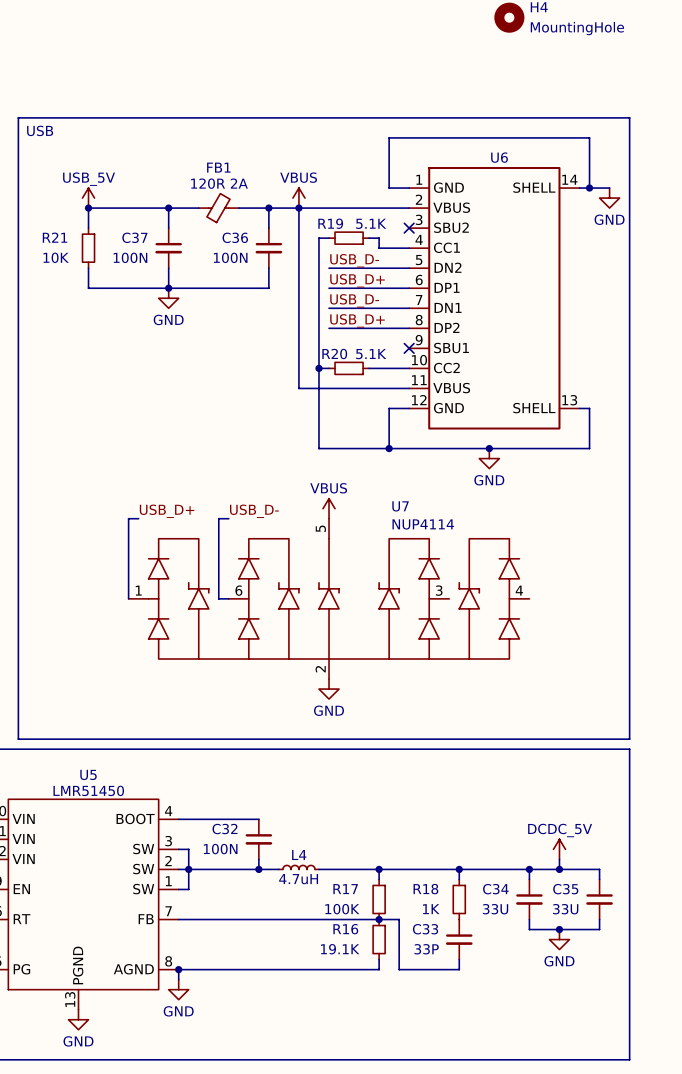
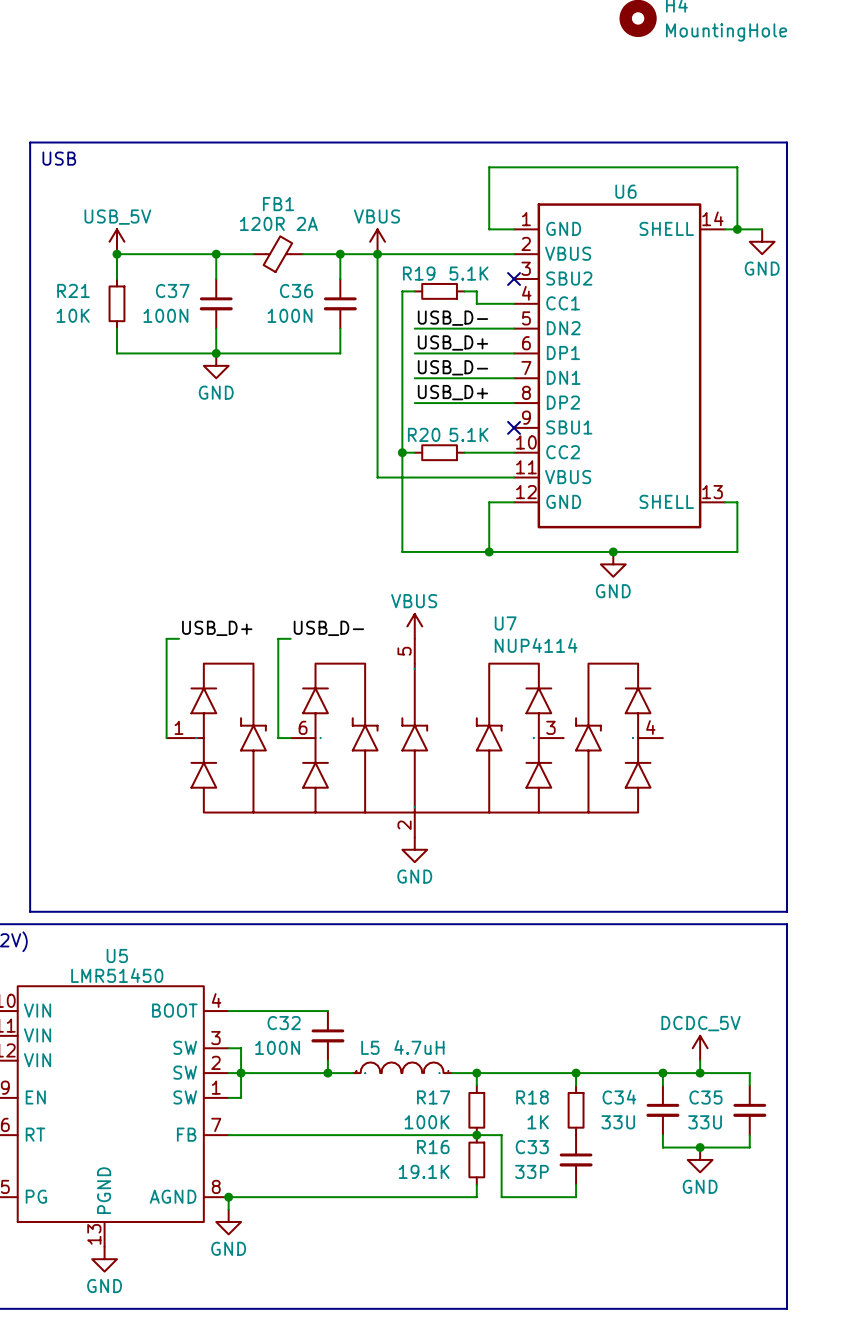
L5: none -> 4.7uH (402, 1067)
L4: 4.7uH (298, 867) -> none
wire: (318, 869) (359, 869) -> none

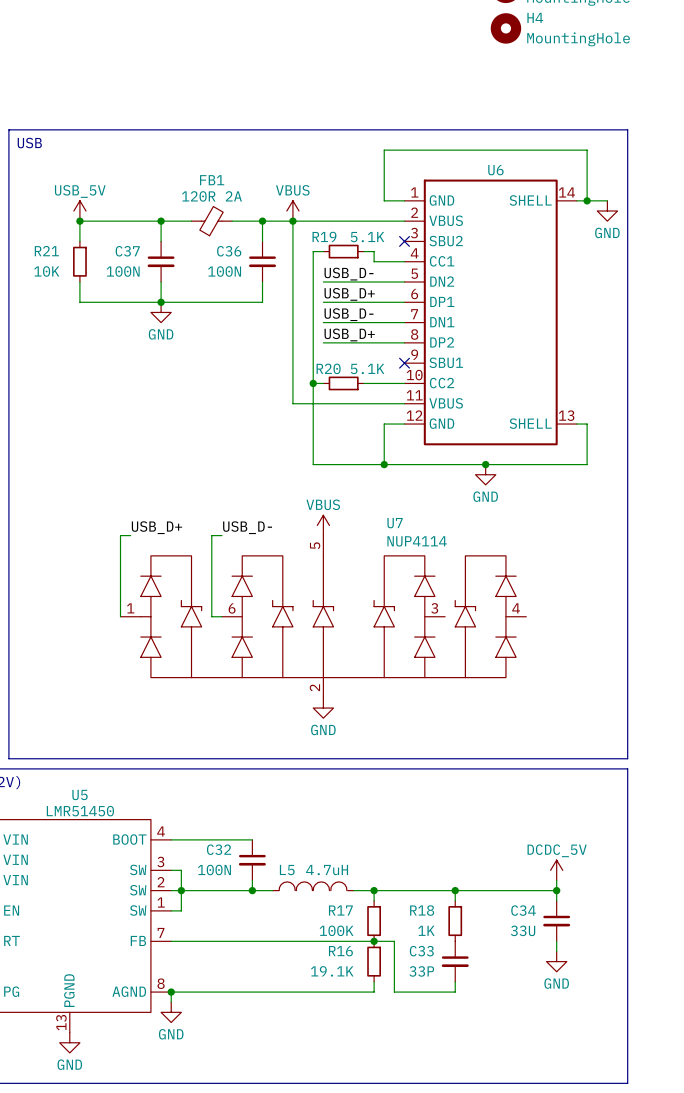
wire: (662, 1073) (662, 1085) -> (556, 941) (556, 951)
junction: (662, 1073) -> none
wire: (700, 1073) (749, 1073) (749, 1085) -> (556, 890) (556, 900)
C34 position: (662, 1110) -> (556, 921)
C35: 33U (749, 1110) -> none
wire: (662, 1135) (662, 1147) (749, 1147) (749, 1135) -> none
junction: (700, 1147) -> none

